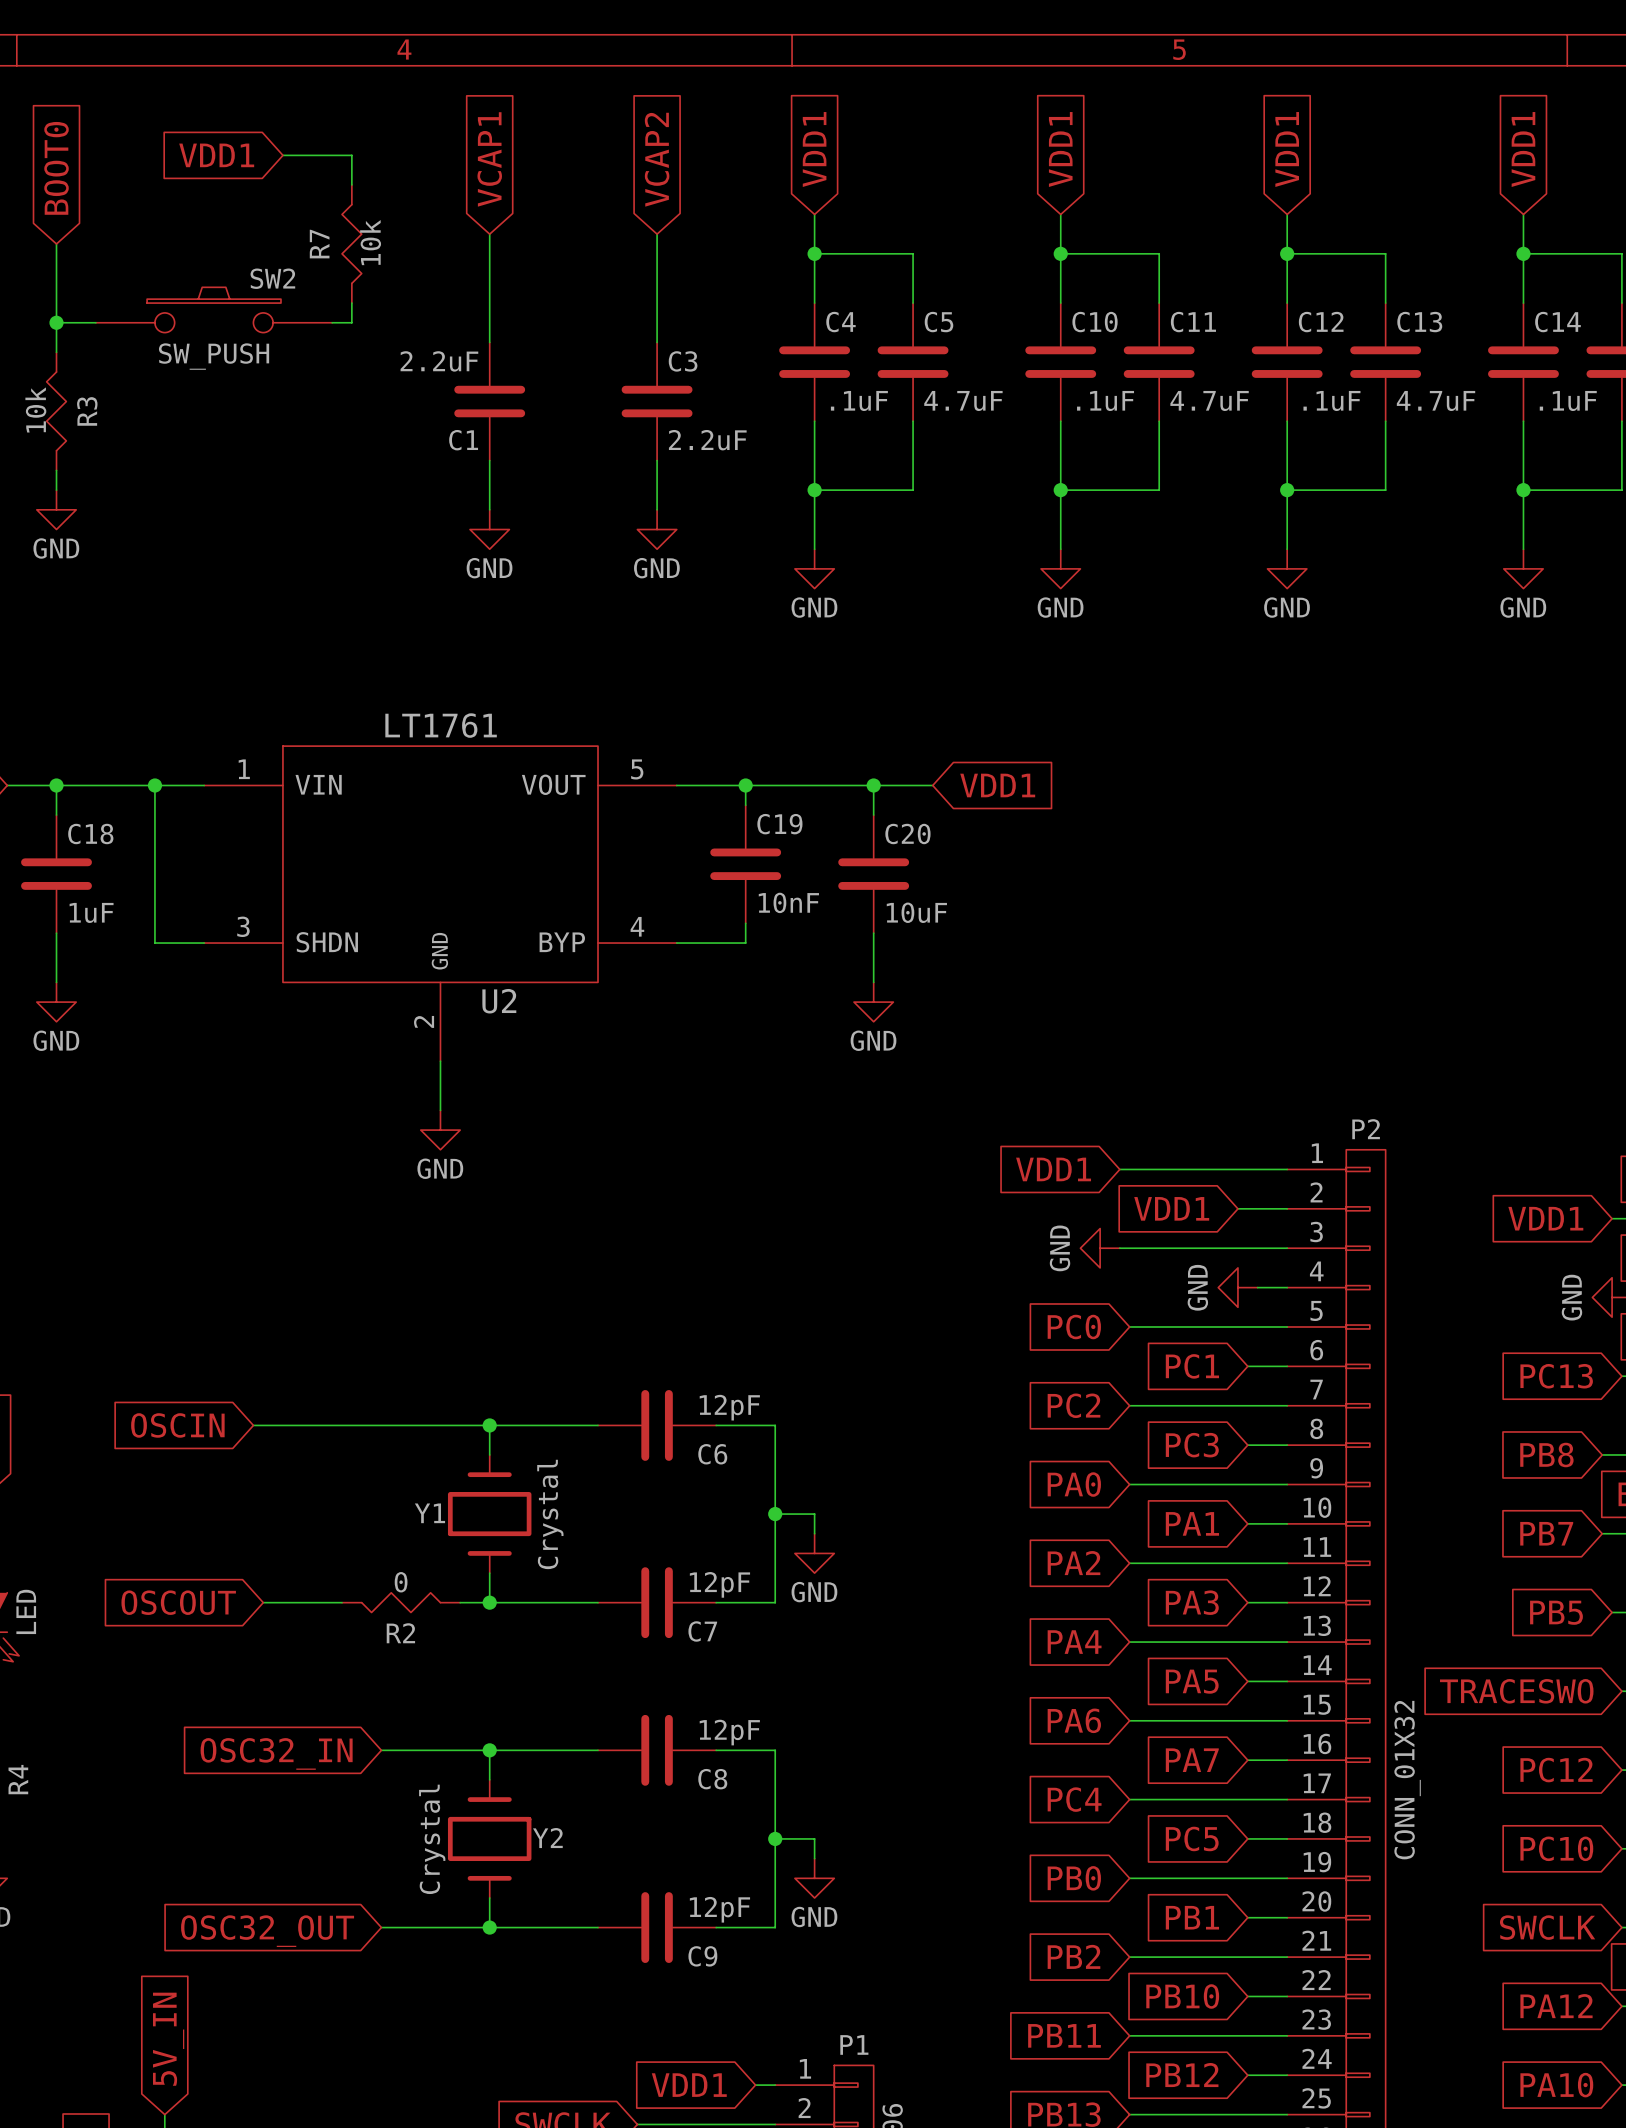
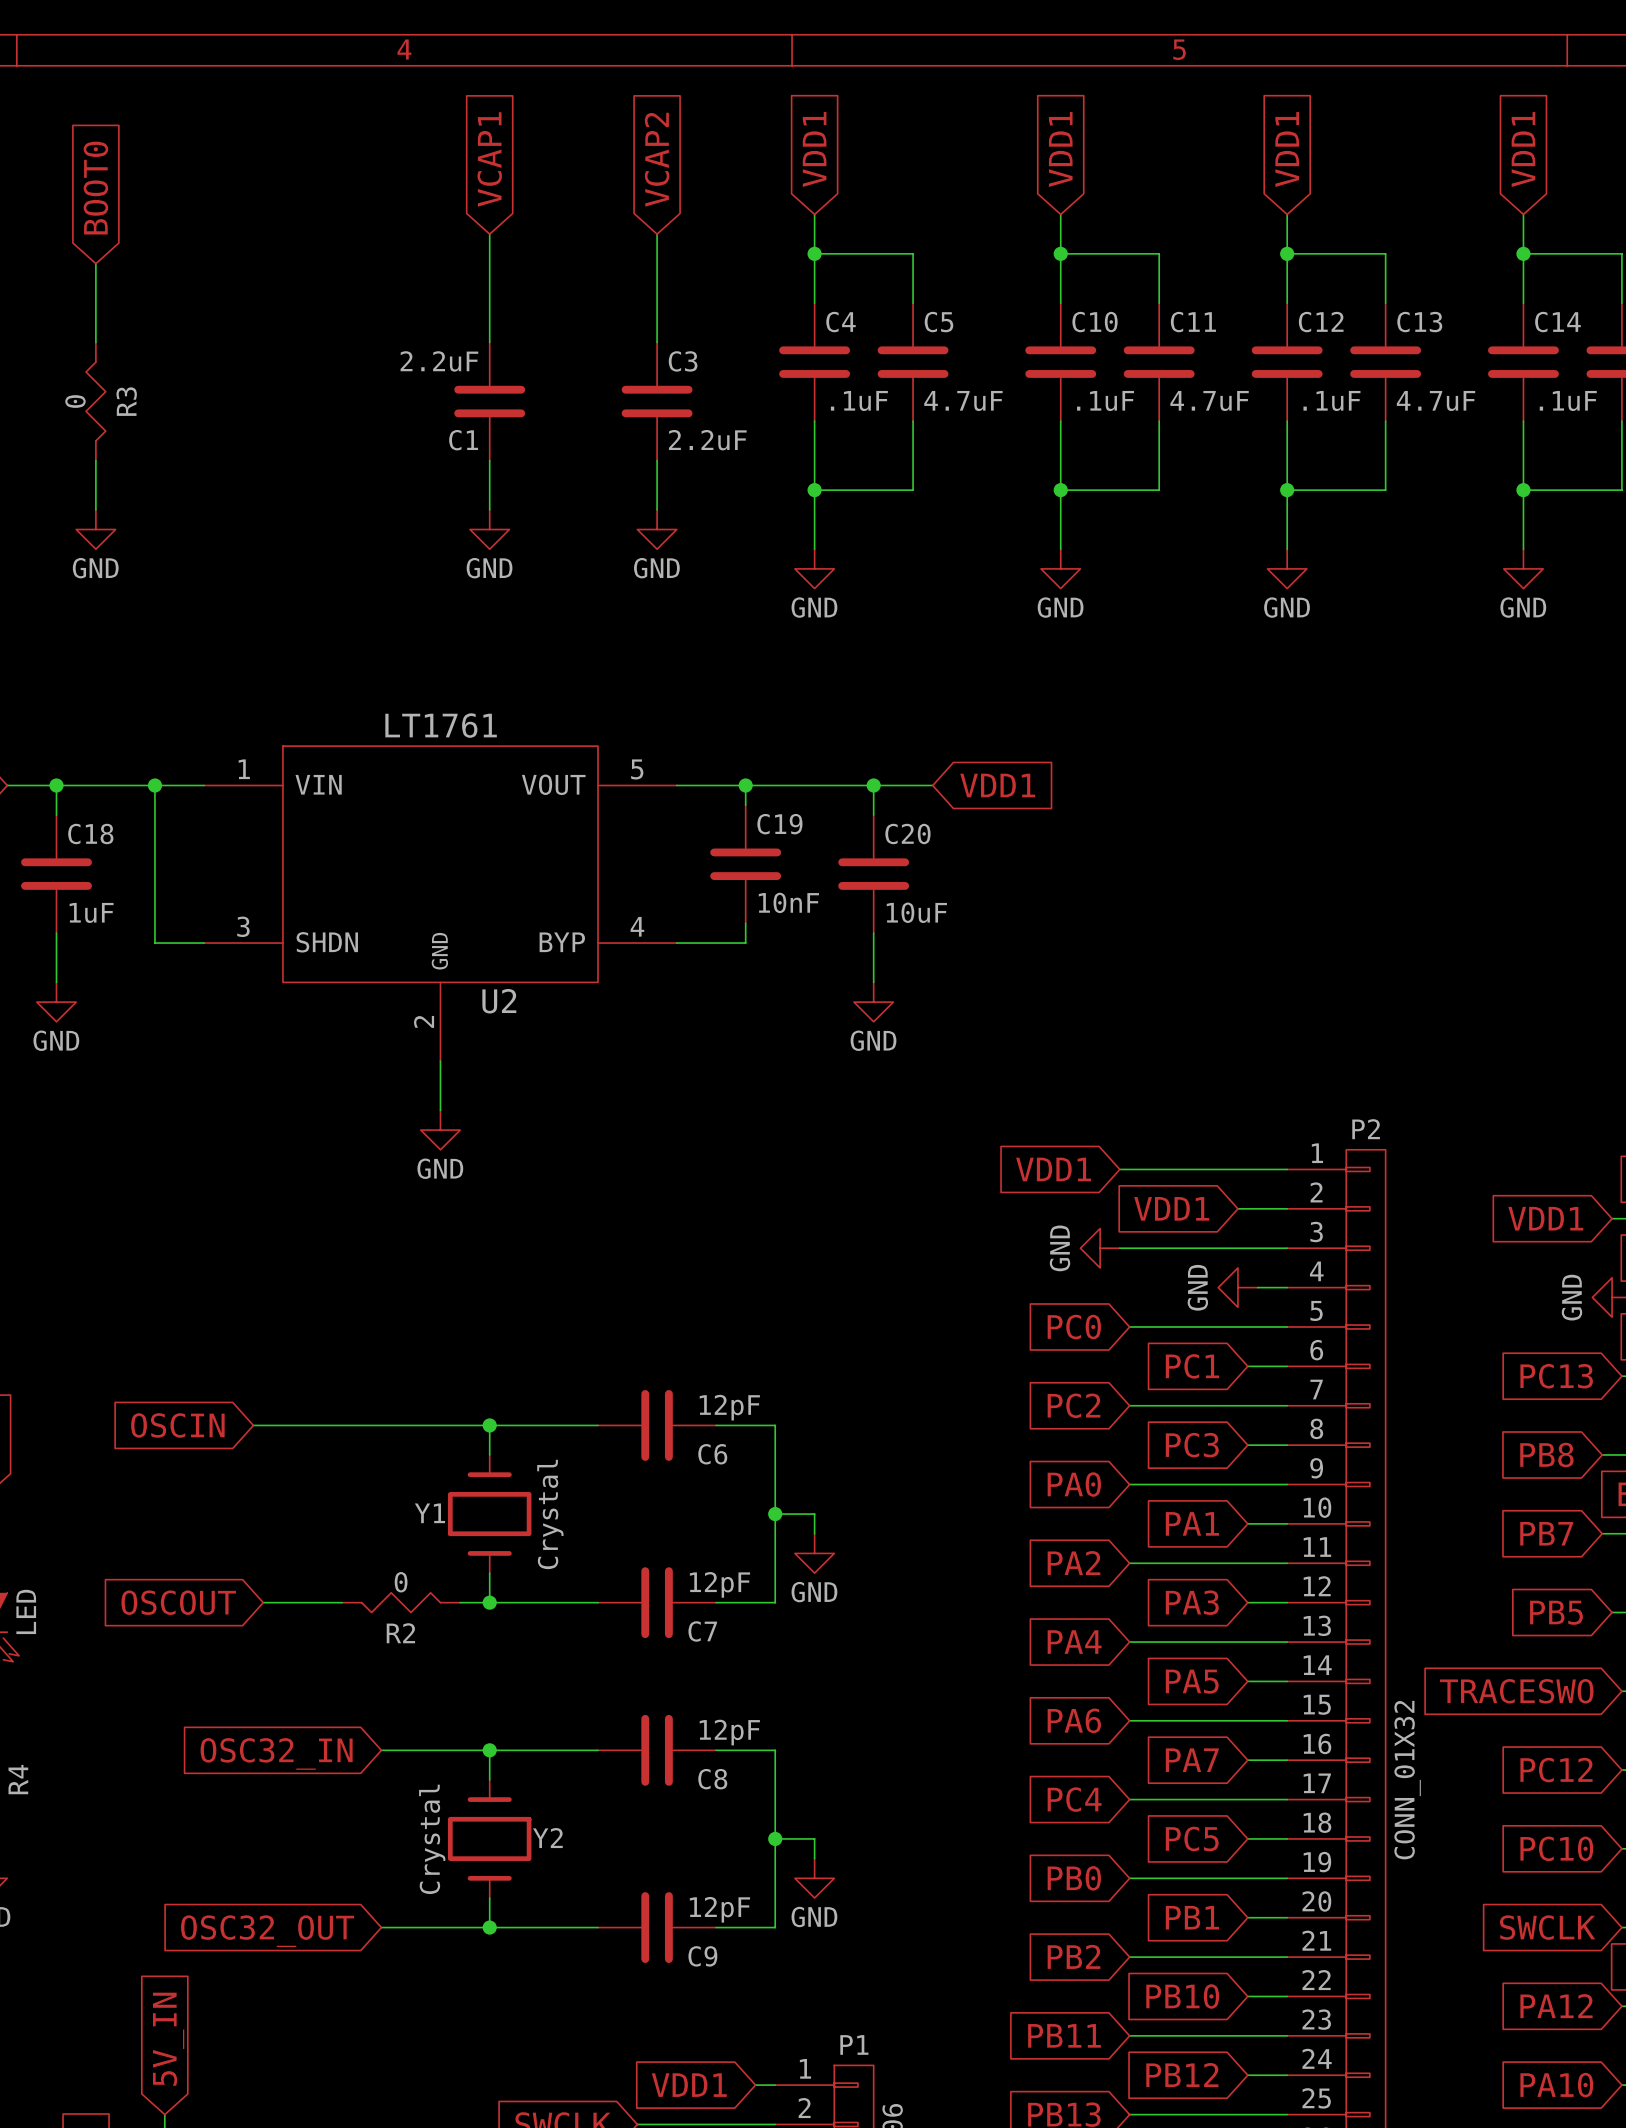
global label: VDD1 (216, 155) -> none
wire: (282, 155) (351, 155) (351, 184) -> none
global label position: BOOT0 (56, 168) -> BOOT0 (95, 188)
wire: (56, 244) (56, 352) -> none
R7: 10k (351, 244) -> none
wire: none -> (95, 263) (95, 342)
wire: (351, 303) (351, 322) (332, 322) -> none
SW2: SW_PUSH (214, 309) -> none
wire: (56, 322) (95, 322) -> none
junction: (56, 322) -> none
R3 value: 10k (35, 409) -> 0 (75, 401)
R3 position: (56, 411) -> (95, 401)
wire: none -> (95, 460) (95, 509)
wire: (56, 470) (56, 490) -> none
power symbol position: GND (56, 509) -> GND (95, 529)

